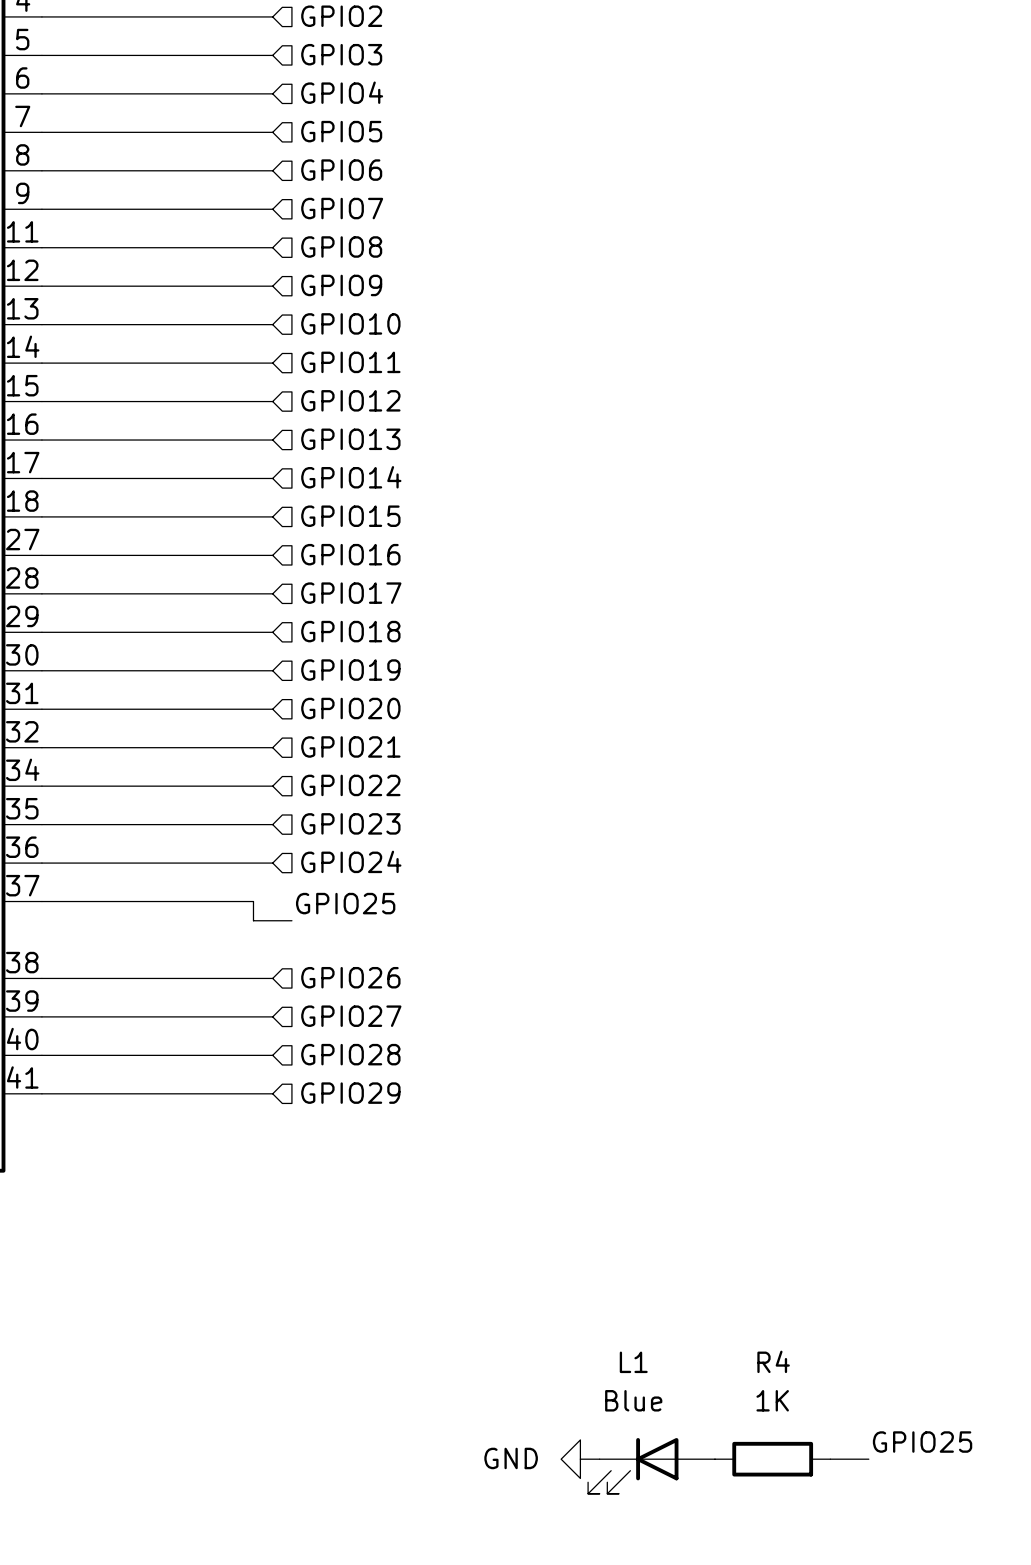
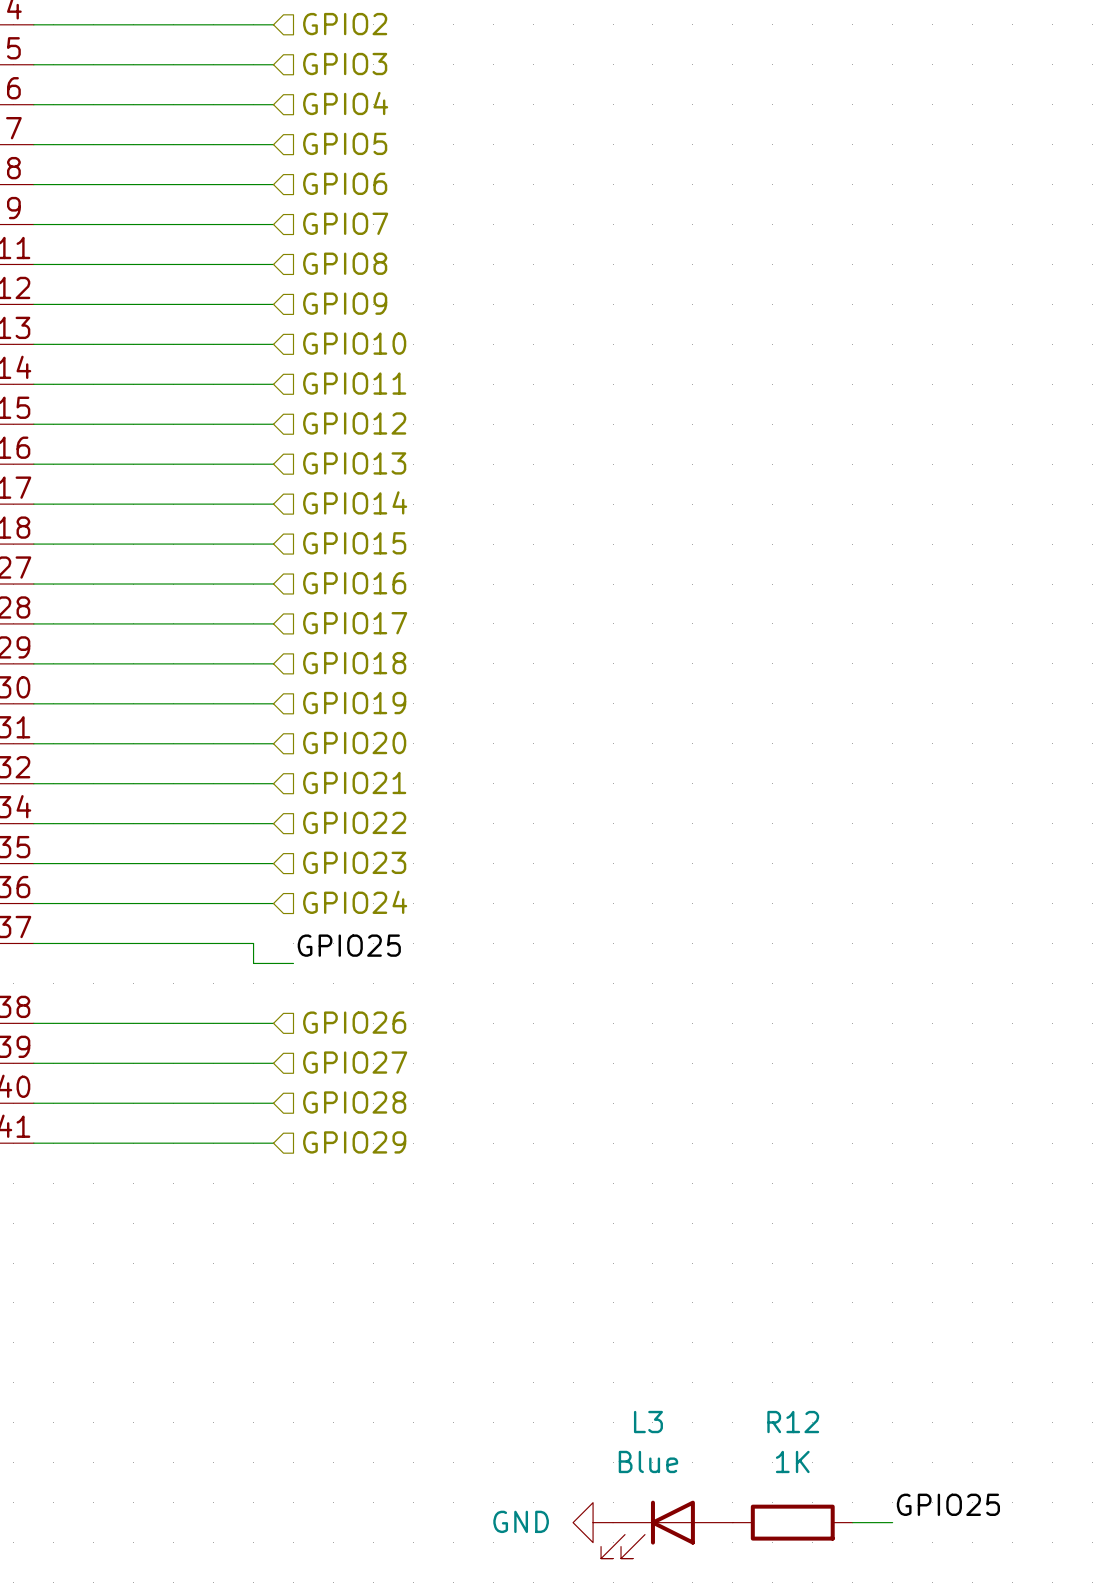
R4 name: R4 (773, 1361) -> R12 (793, 1422)
L1 name: L1 (633, 1362) -> L3 (648, 1422)

